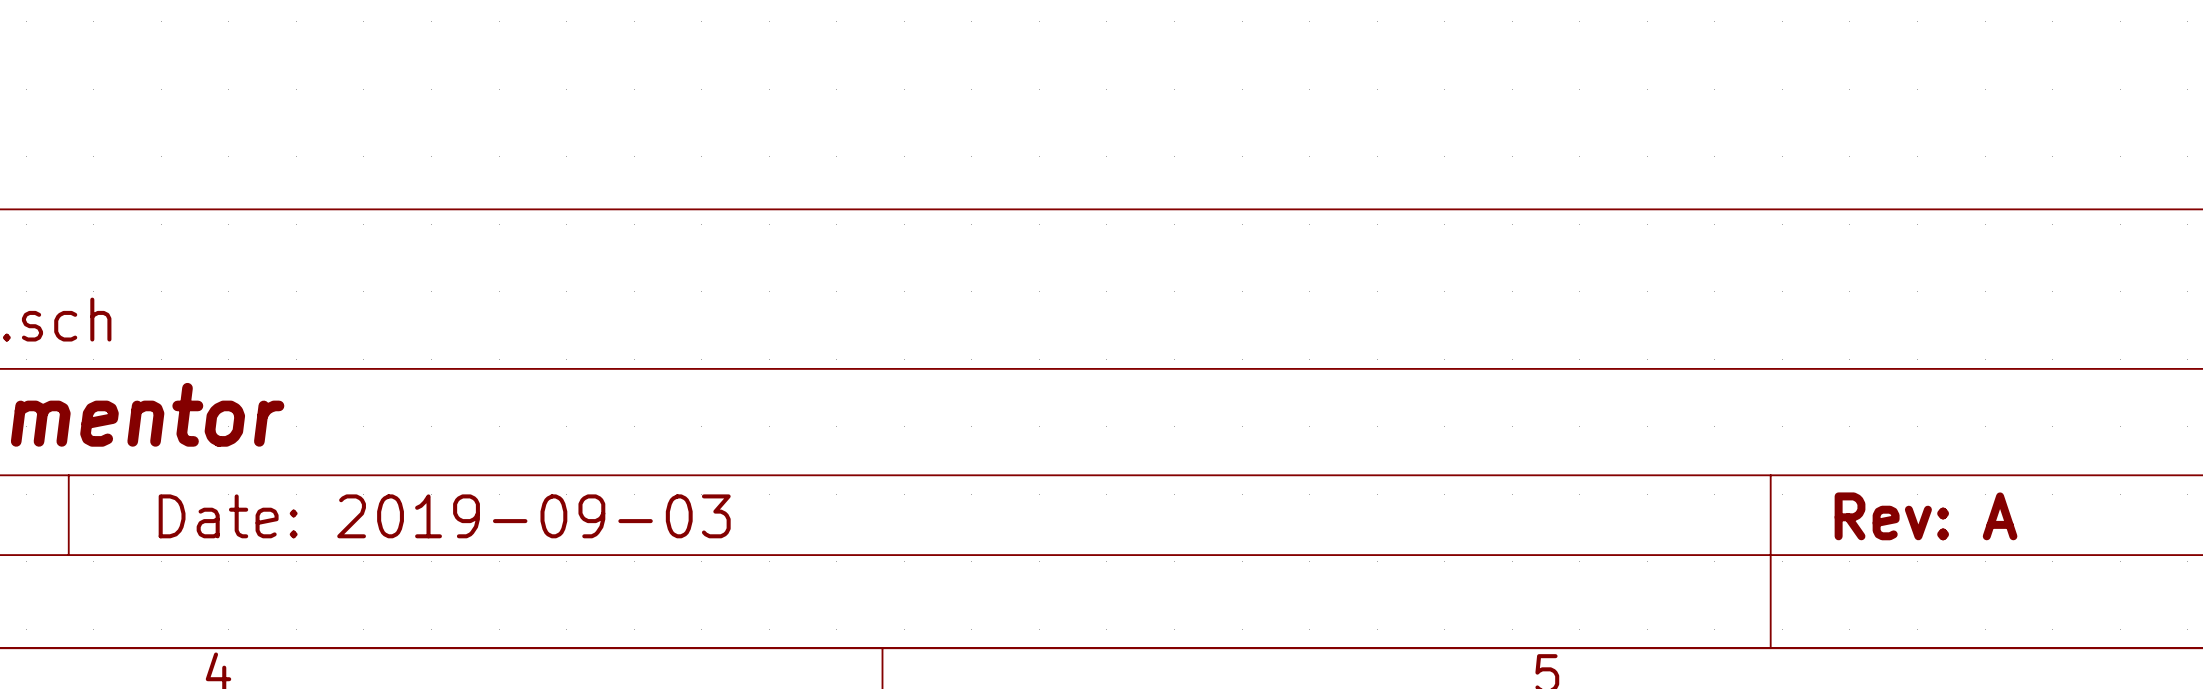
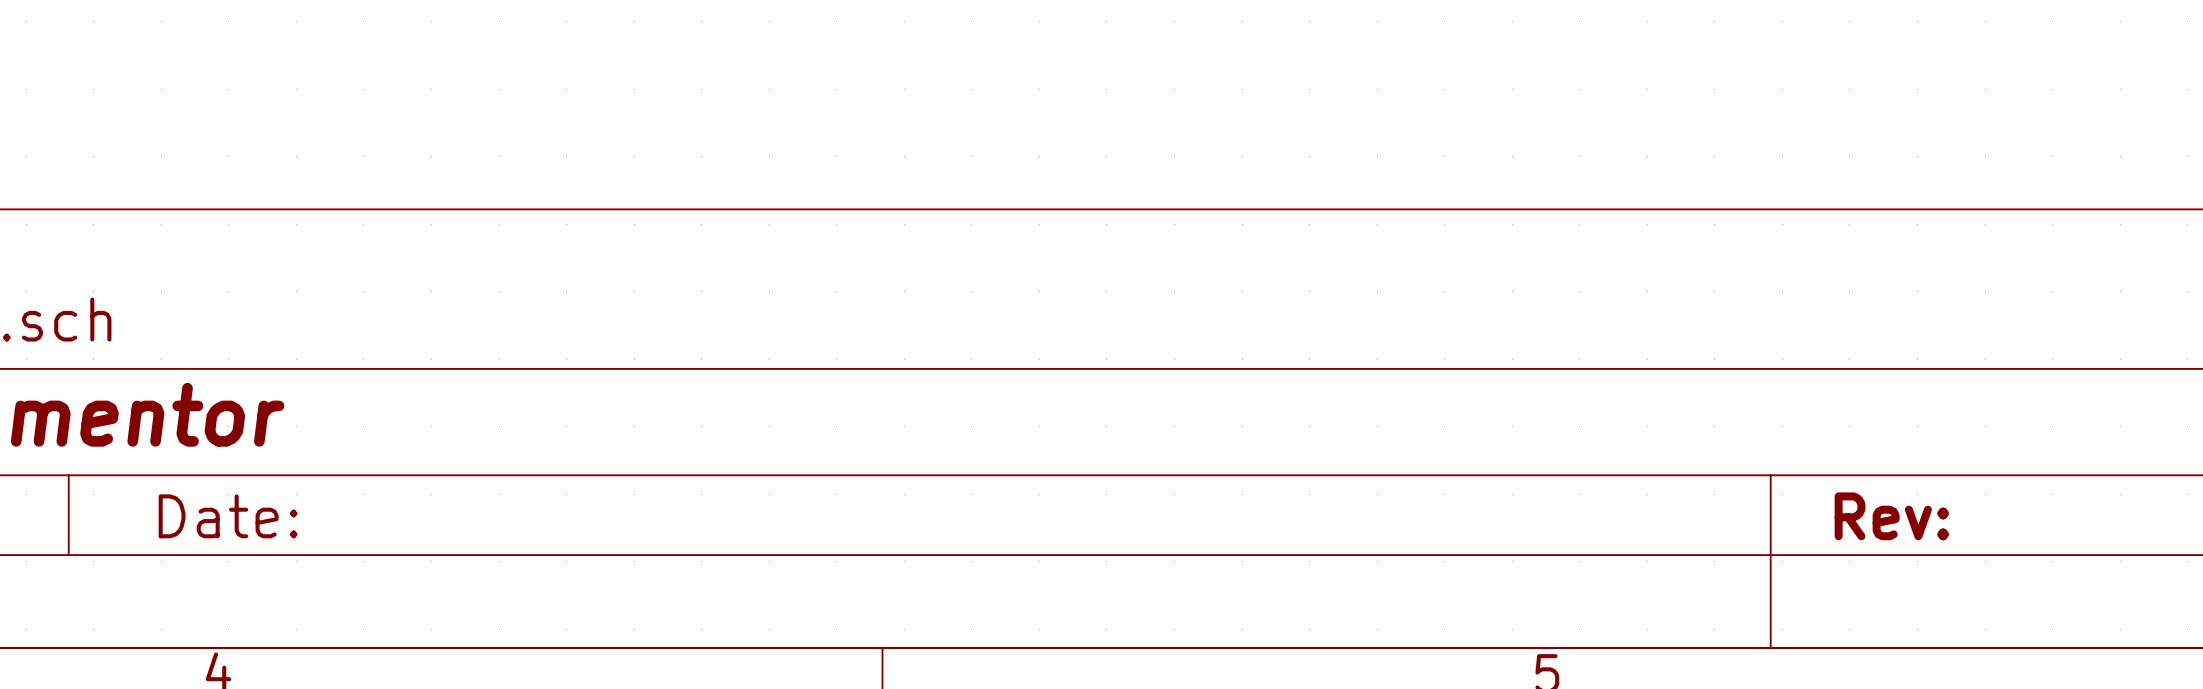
title block: Date: 2019-09-03 (444, 516) -> Date: (228, 516)
title block: Rev: A (1926, 516) -> Rev: (1891, 516)

